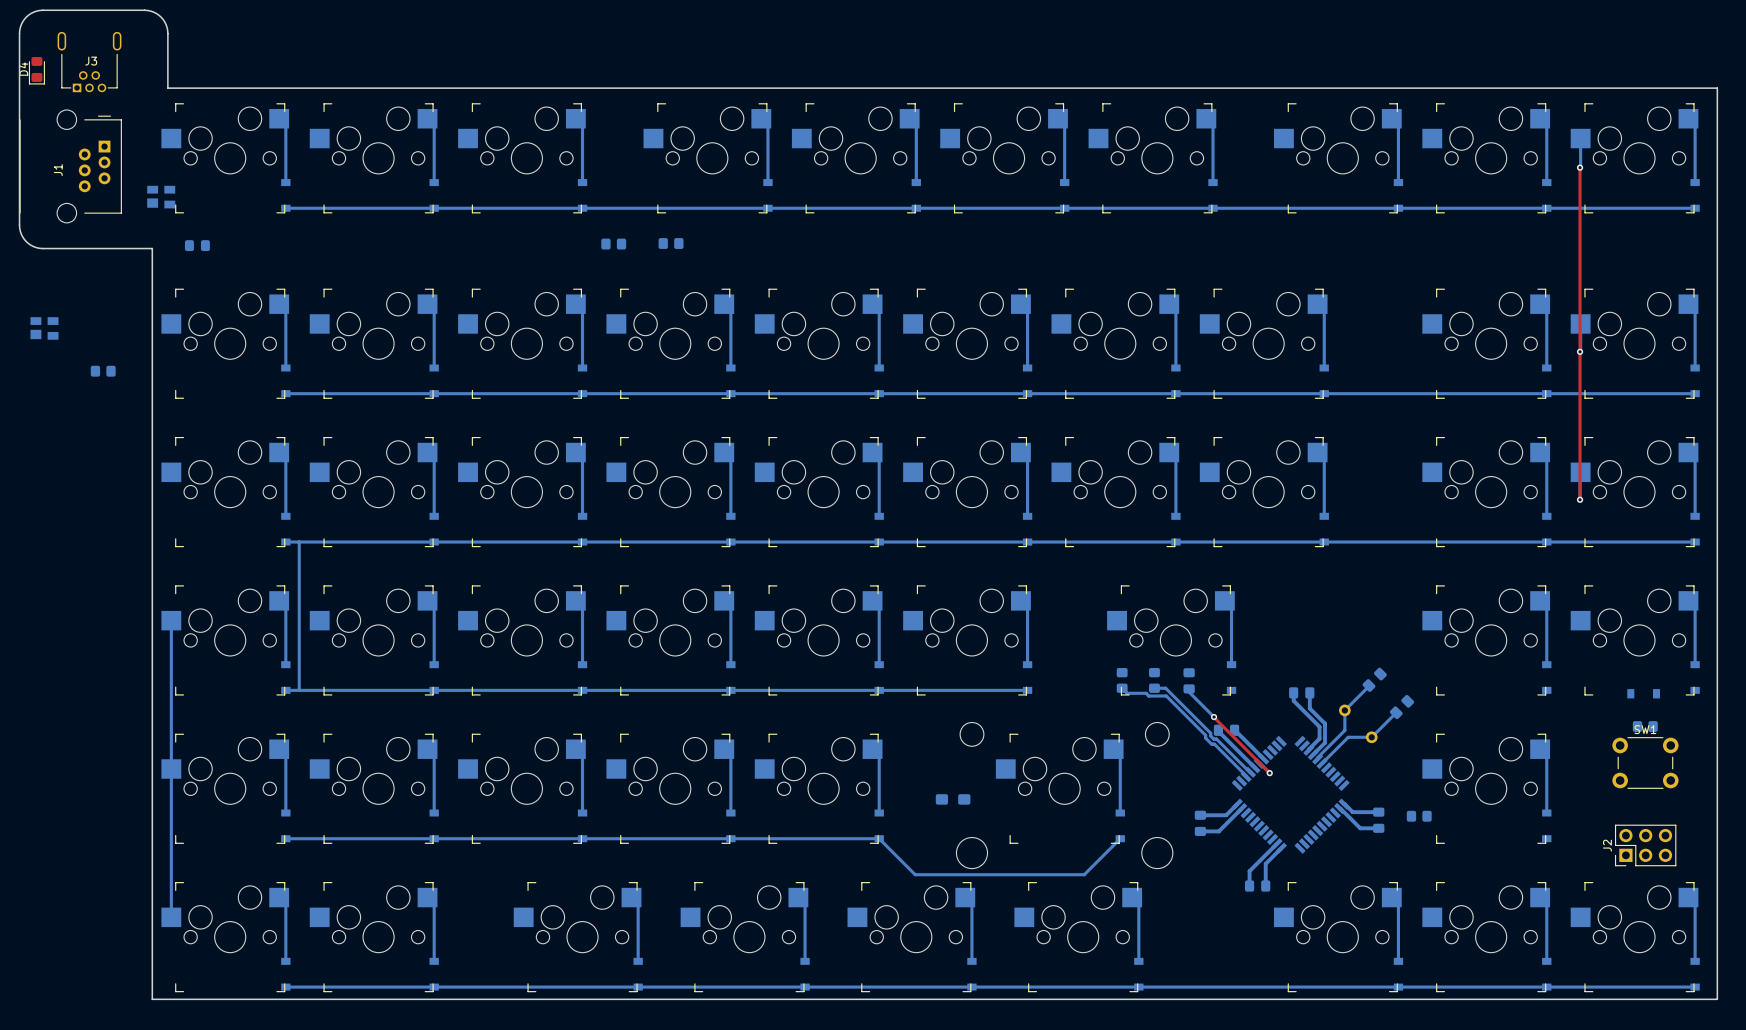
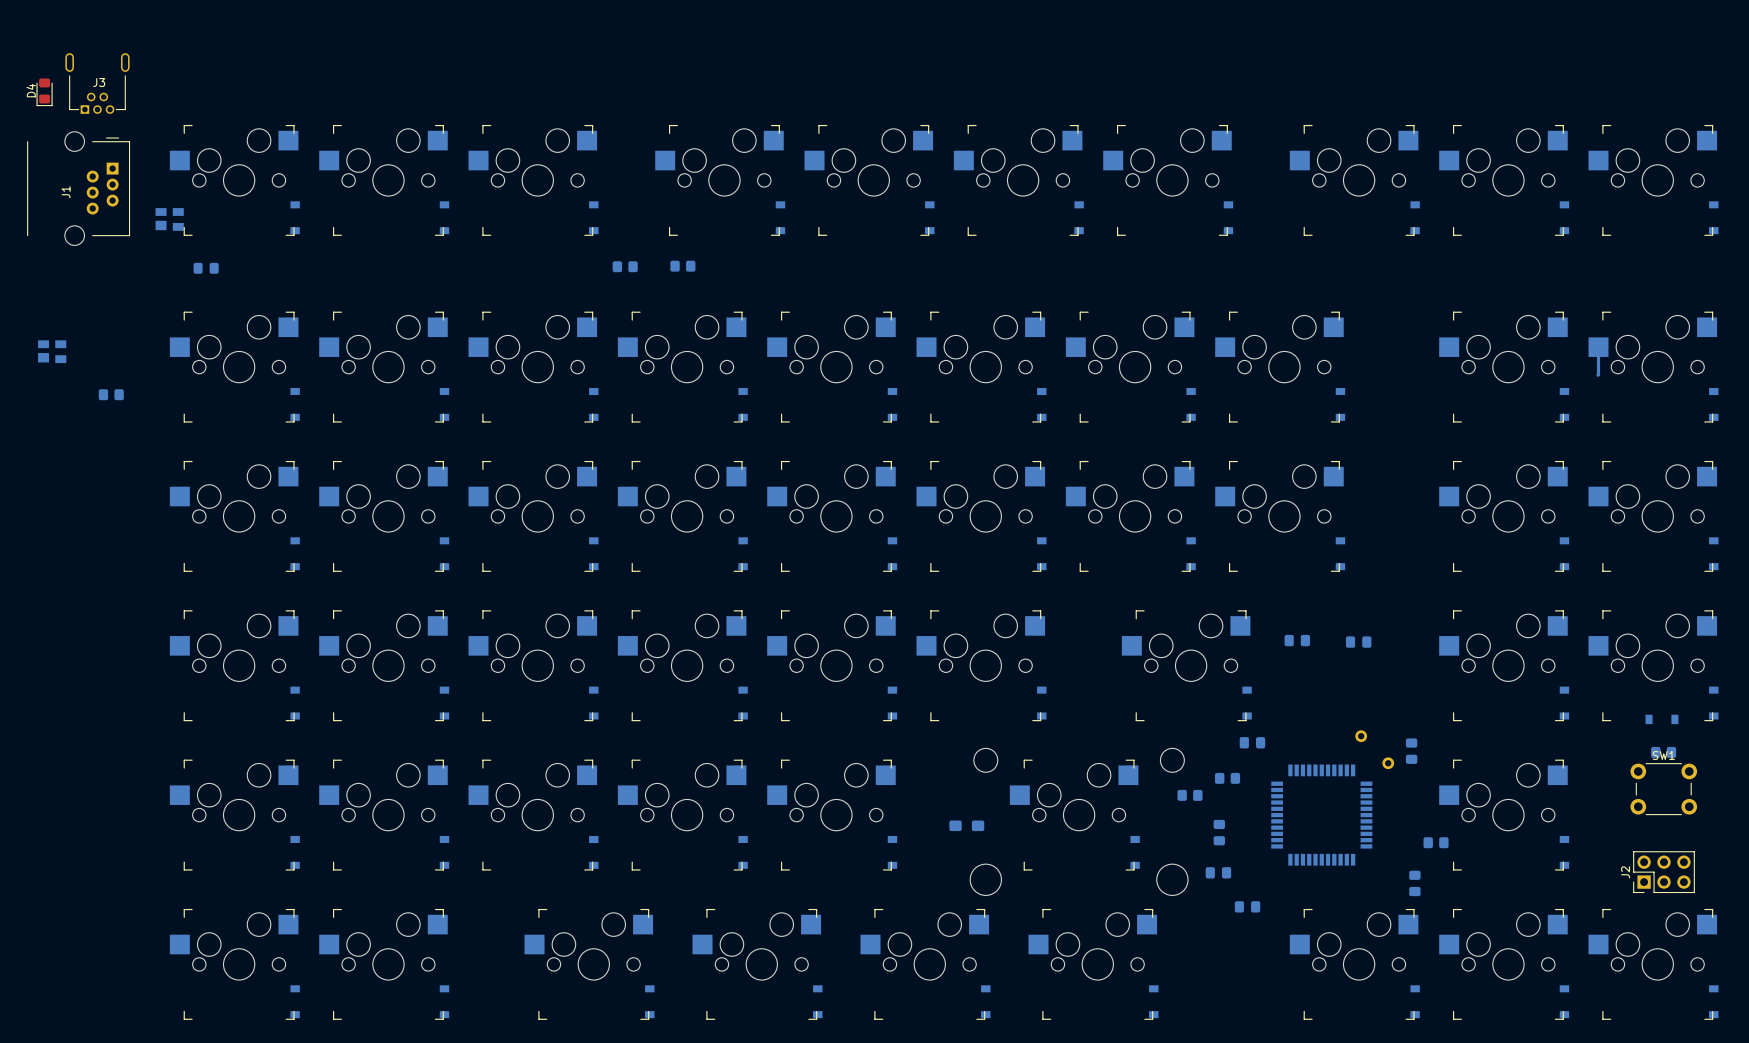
board edge: (42, 10) (144, 10) (156, 13) (164, 21) (167, 30) (167, 88) (1717, 88) (1717, 999) (152, 999) (152, 248) (39, 248) (28, 243) (21, 234) (19, 225) (19, 30) (26, 17) (33, 12) (42, 10) -> none
bottom track: (279, 118) (285, 125) (285, 182) -> none
bottom track: (427, 118) (434, 125) (434, 182) -> none
bottom track: (575, 118) (582, 125) (582, 182) -> none
bottom track: (761, 118) (767, 125) (767, 182) -> none
bottom track: (909, 118) (916, 125) (916, 182) -> none
bottom track: (1058, 118) (1064, 125) (1064, 182) -> none
bottom track: (1206, 118) (1213, 125) (1213, 182) -> none
bottom track: (1391, 118) (1398, 125) (1398, 182) -> none
bottom track: (1540, 118) (1546, 125) (1546, 182) -> none
bottom track: (1688, 118) (1695, 125) (1695, 182) -> none
bottom track: (1580, 138) (1580, 167) -> none
top track: (1580, 167) (1580, 499) -> none
via: (1580, 167) -> none
bottom track: (285, 208) (1695, 208) -> none
bottom track: (279, 304) (285, 310) (285, 367) -> none
bottom track: (427, 304) (434, 310) (434, 367) -> none
bottom track: (575, 304) (582, 310) (582, 367) -> none
bottom track: (724, 304) (730, 310) (730, 367) -> none
bottom track: (872, 304) (879, 310) (879, 367) -> none
bottom track: (1020, 304) (1027, 310) (1027, 367) -> none
bottom track: (1169, 304) (1175, 310) (1175, 367) -> none
bottom track: (1317, 304) (1324, 310) (1324, 367) -> none
bottom track: (1540, 304) (1546, 310) (1546, 367) -> none
bottom track: (1688, 304) (1695, 310) (1695, 367) -> none
via: (1580, 351) -> none
bottom track: (285, 393) (1695, 393) -> none
bottom track: (279, 452) (285, 459) (285, 516) -> none
bottom track: (427, 452) (434, 459) (434, 516) -> none
bottom track: (575, 452) (582, 459) (582, 516) -> none
bottom track: (724, 452) (730, 459) (730, 516) -> none
bottom track: (872, 452) (879, 459) (879, 516) -> none
bottom track: (1020, 452) (1027, 459) (1027, 516) -> none
bottom track: (1169, 452) (1175, 459) (1175, 516) -> none
bottom track: (1317, 452) (1324, 459) (1324, 516) -> none
bottom track: (1540, 452) (1546, 459) (1546, 516) -> none
bottom track: (1688, 452) (1695, 459) (1695, 516) -> none
via: (1580, 499) -> none
bottom track: (285, 542) (1695, 542) -> none
bottom track: (299, 542) (299, 690) -> none
bottom track: (279, 600) (285, 607) (285, 664) -> none
bottom track: (427, 600) (434, 607) (434, 664) -> none
bottom track: (575, 600) (582, 607) (582, 664) -> none
bottom track: (724, 600) (730, 607) (730, 664) -> none
bottom track: (872, 600) (879, 607) (879, 664) -> none
bottom track: (1020, 600) (1027, 607) (1027, 664) -> none
bottom track: (1224, 600) (1231, 607) (1231, 664) -> none
bottom track: (1540, 600) (1546, 607) (1546, 664) -> none
bottom track: (1688, 600) (1695, 607) (1695, 664) -> none
part: none -> (1297, 640)
part: none -> (1358, 642)
bottom track: (171, 620) (171, 917) -> none
part: (1374, 679) -> none
part: (1122, 680) -> none
part: (1154, 680) -> none
part: (1189, 680) -> none
bottom track: (1369, 685) (1344, 710) (1344, 730) (1317, 759) -> none
bottom track: (1122, 688) (1127, 693) (1166, 696) (1205, 735) (1205, 738) (1211, 744) (1214, 744) (1246, 776) -> none
bottom track: (1154, 688) (1165, 688) (1210, 733) (1213, 739) (1216, 739) (1250, 772) -> none
bottom track: (1189, 688) (1189, 692) (1214, 717) -> none
bottom track: (285, 690) (1027, 690) -> none
bottom track: (1293, 692) (1293, 700) (1319, 726) (1319, 738) (1308, 750) -> none
part: (1301, 692) -> none
bottom track: (1309, 692) (1309, 708) (1325, 723) (1325, 742) (1313, 754) -> none
part: (1401, 707) -> none
bottom track: (1396, 712) (1371, 737) (1348, 737) (1322, 763) -> none
top track: (1214, 717) (1269, 773) -> none
via: (1214, 717) -> none
part: none -> (1411, 751)
bottom track: (1218, 730) (1254, 767) -> none
part position: (1226, 730) -> (1252, 742)
bottom track: (1234, 730) (1263, 759) -> none
bottom track: (279, 749) (285, 755) (285, 813) -> none
bottom track: (427, 749) (434, 755) (434, 813) -> none
bottom track: (575, 749) (582, 755) (582, 813) -> none
bottom track: (724, 749) (730, 755) (730, 813) -> none
bottom track: (872, 749) (879, 755) (879, 813) -> none
bottom track: (1113, 749) (1120, 755) (1120, 813) -> none
bottom track: (1540, 749) (1546, 755) (1546, 813) -> none
part: none -> (1227, 778)
part: none -> (1189, 795)
via: (1269, 773) -> none
part: none -> (1321, 815)
part: (1290, 794) -> none
bottom track: (1237, 804) (1226, 815) (1200, 815) -> none
bottom track: (1344, 804) (1352, 812) (1378, 812) -> none
part: none -> (1219, 832)
bottom track: (1241, 808) (1218, 831) (1200, 831) -> none
bottom track: (1339, 808) (1360, 828) (1378, 828) -> none
part position: (1378, 820) -> (1414, 883)
part: (1200, 823) -> none
bottom track: (285, 838) (879, 838) (915, 874) (1084, 874) (1120, 838) -> none
bottom track: (1276, 843) (1249, 871) (1249, 886) -> none
part: none -> (1218, 872)
bottom track: (1281, 848) (1265, 863) (1265, 886) -> none
part position: (1257, 886) -> (1247, 906)
bottom track: (279, 897) (285, 904) (285, 961) -> none
bottom track: (427, 897) (434, 904) (434, 961) -> none
bottom track: (631, 897) (638, 904) (638, 961) -> none
bottom track: (798, 897) (805, 904) (805, 961) -> none
bottom track: (965, 897) (971, 904) (971, 961) -> none
bottom track: (1132, 897) (1138, 904) (1138, 961) -> none
bottom track: (1391, 897) (1398, 904) (1398, 961) -> none
bottom track: (1540, 897) (1546, 904) (1546, 961) -> none
bottom track: (1688, 897) (1695, 904) (1695, 961) -> none
bottom track: (285, 987) (1695, 987) -> none

